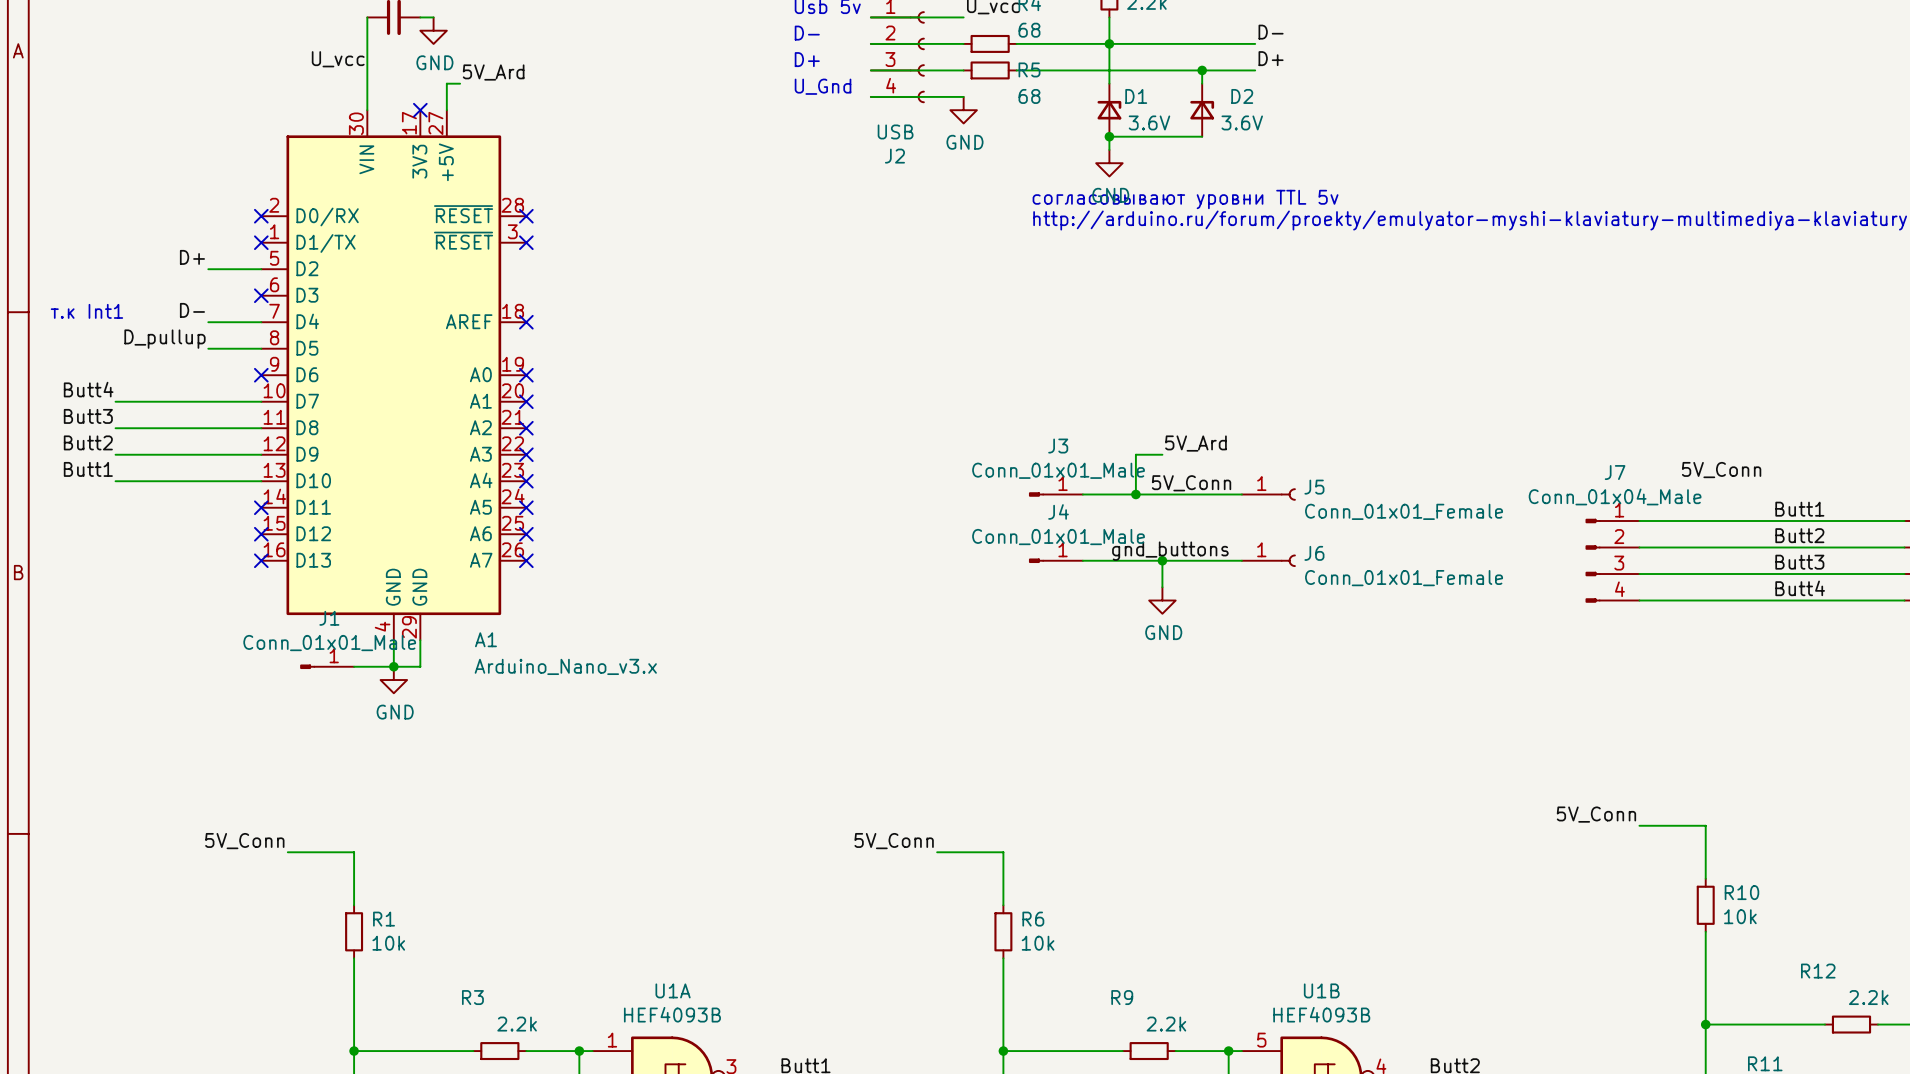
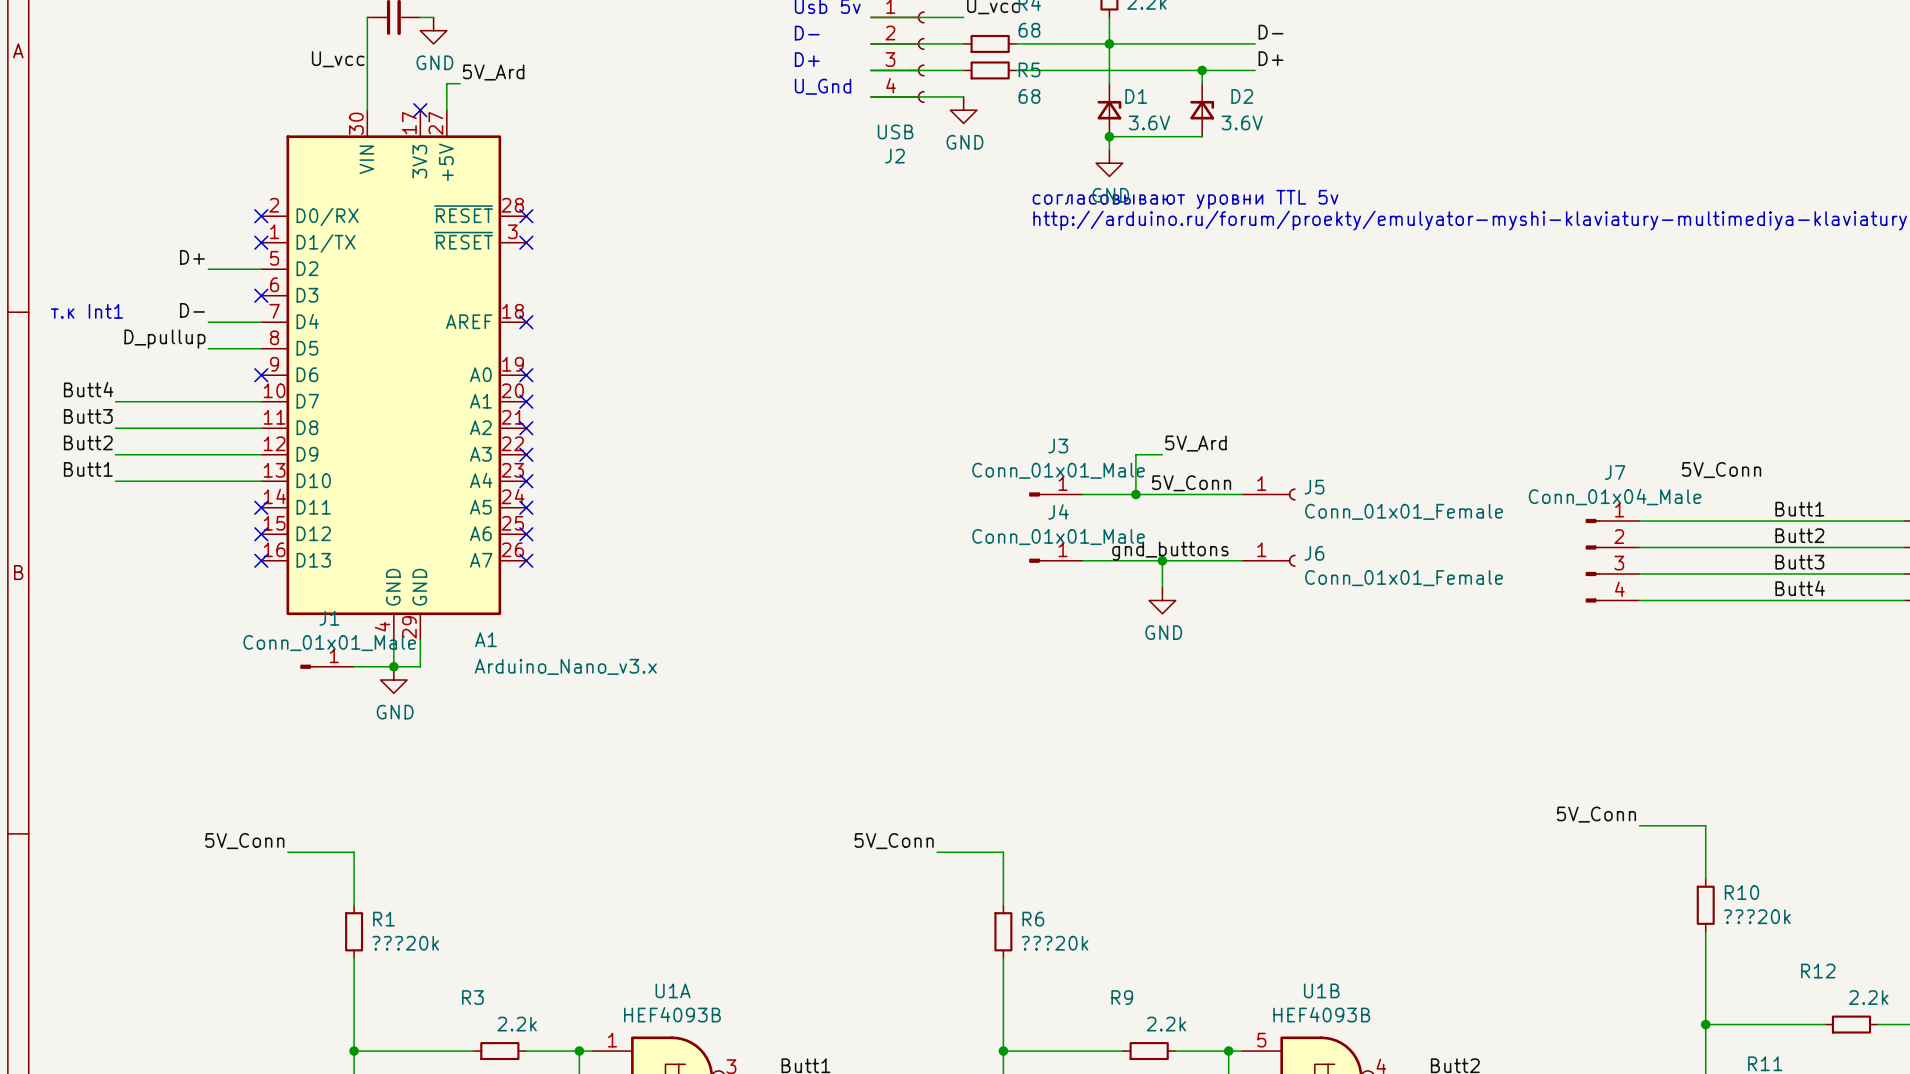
R10 value: 10k (1740, 916) -> ???20k (1757, 916)
R1 value: 10k (388, 943) -> ???20k (405, 943)
R6 value: 10k (1038, 943) -> ???20k (1055, 943)

